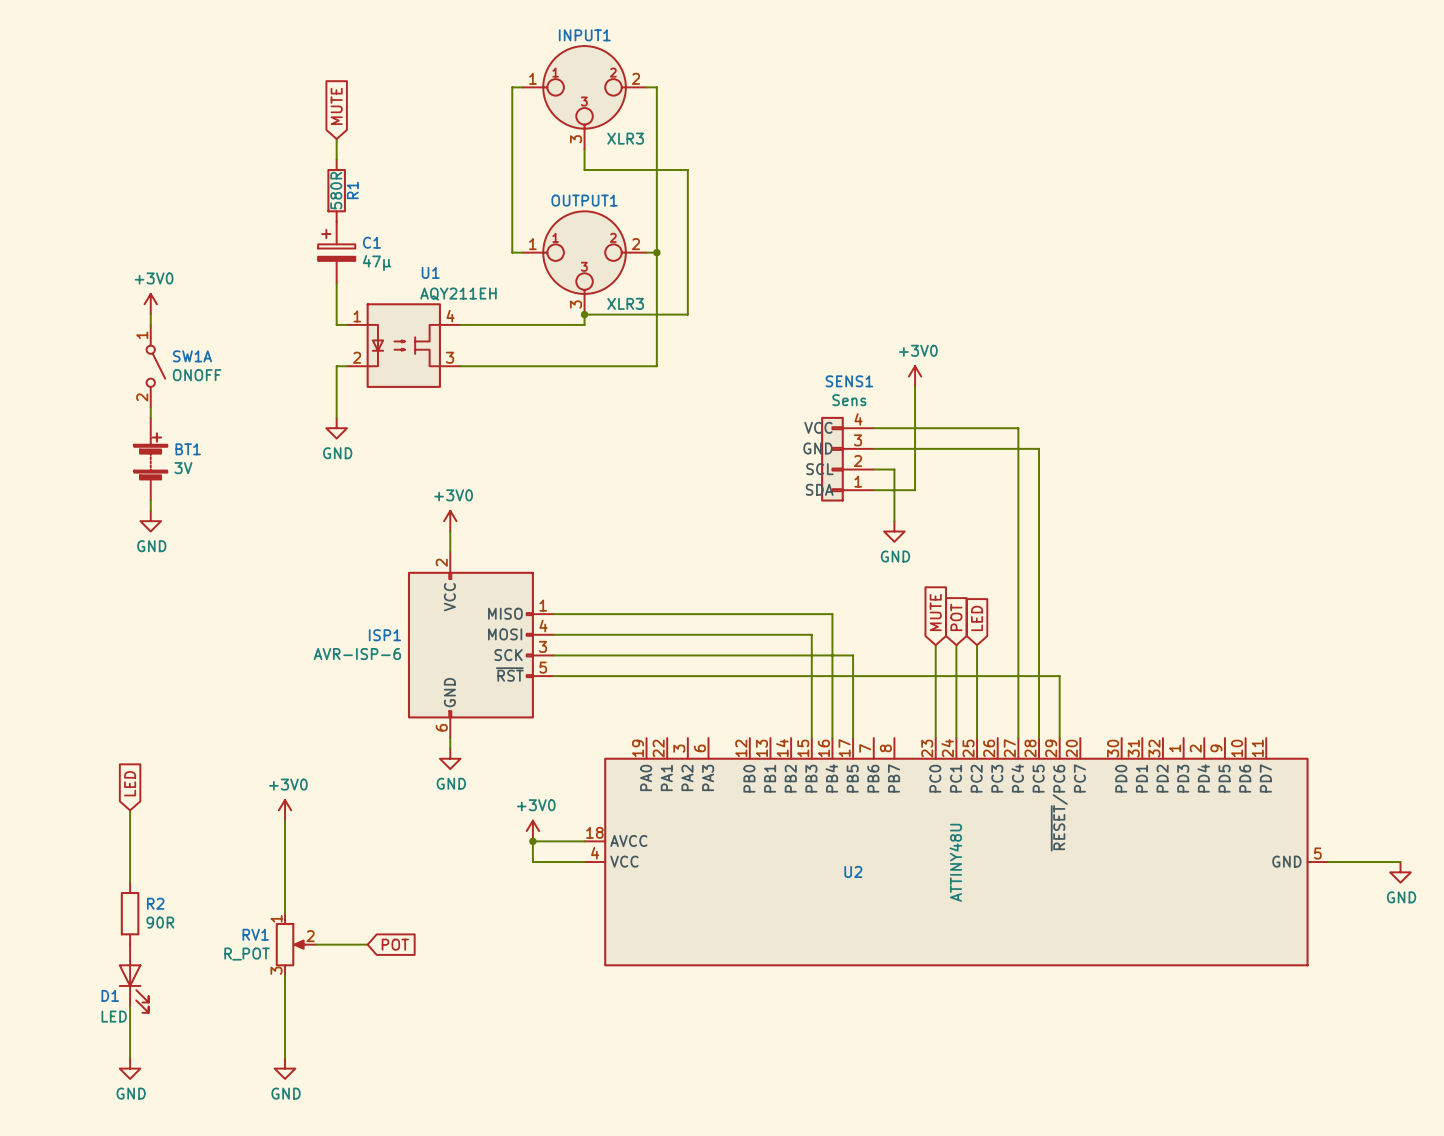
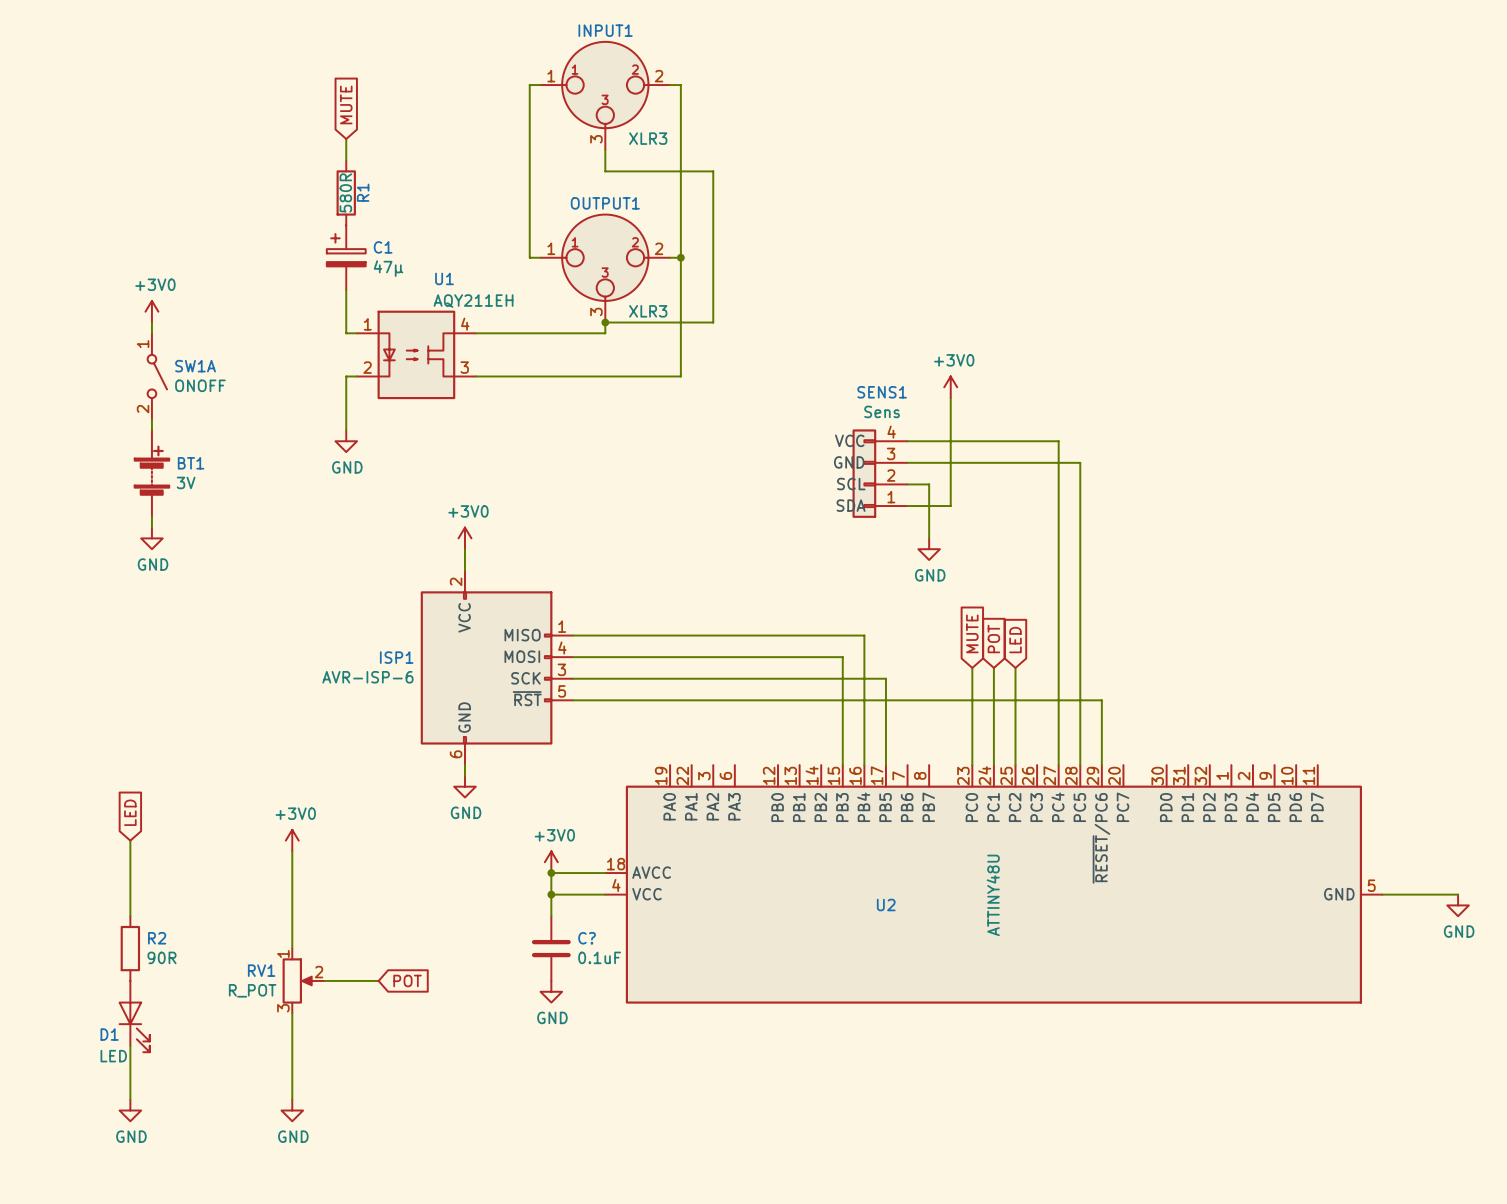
wire: none -> (551, 894) (551, 916)
junction: none -> (551, 894)
C?: none -> 0.1uF (551, 948)
power symbol: none -> GND (551, 991)

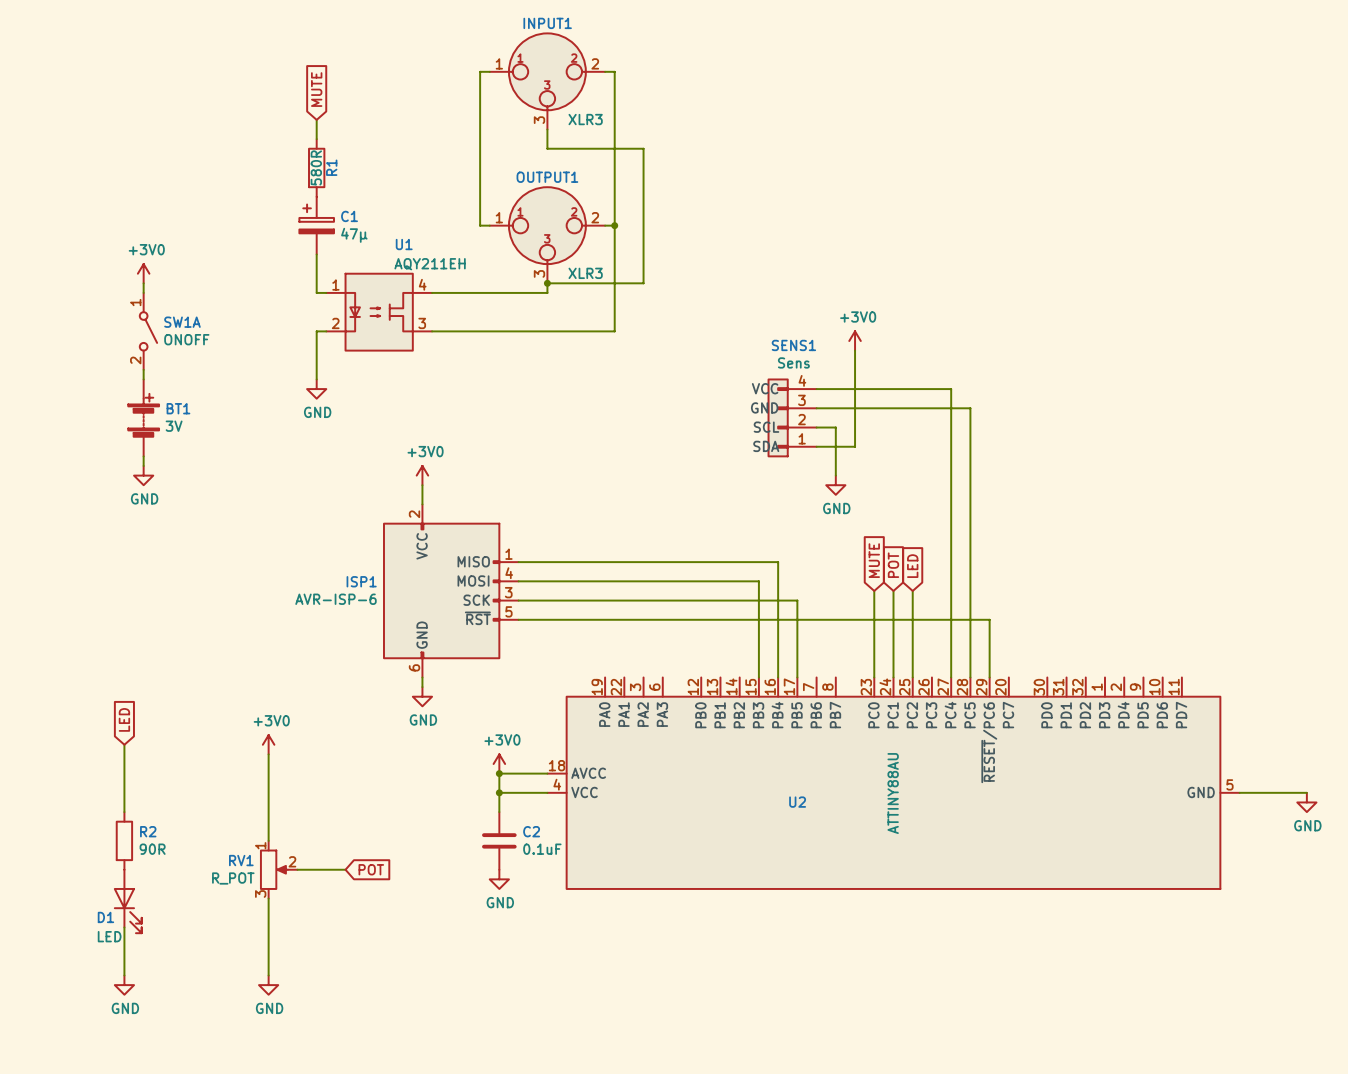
U2 value: ATTINY48U (993, 895) -> ATTINY88AU (893, 793)
C? name: C? (587, 938) -> C2 (531, 831)

